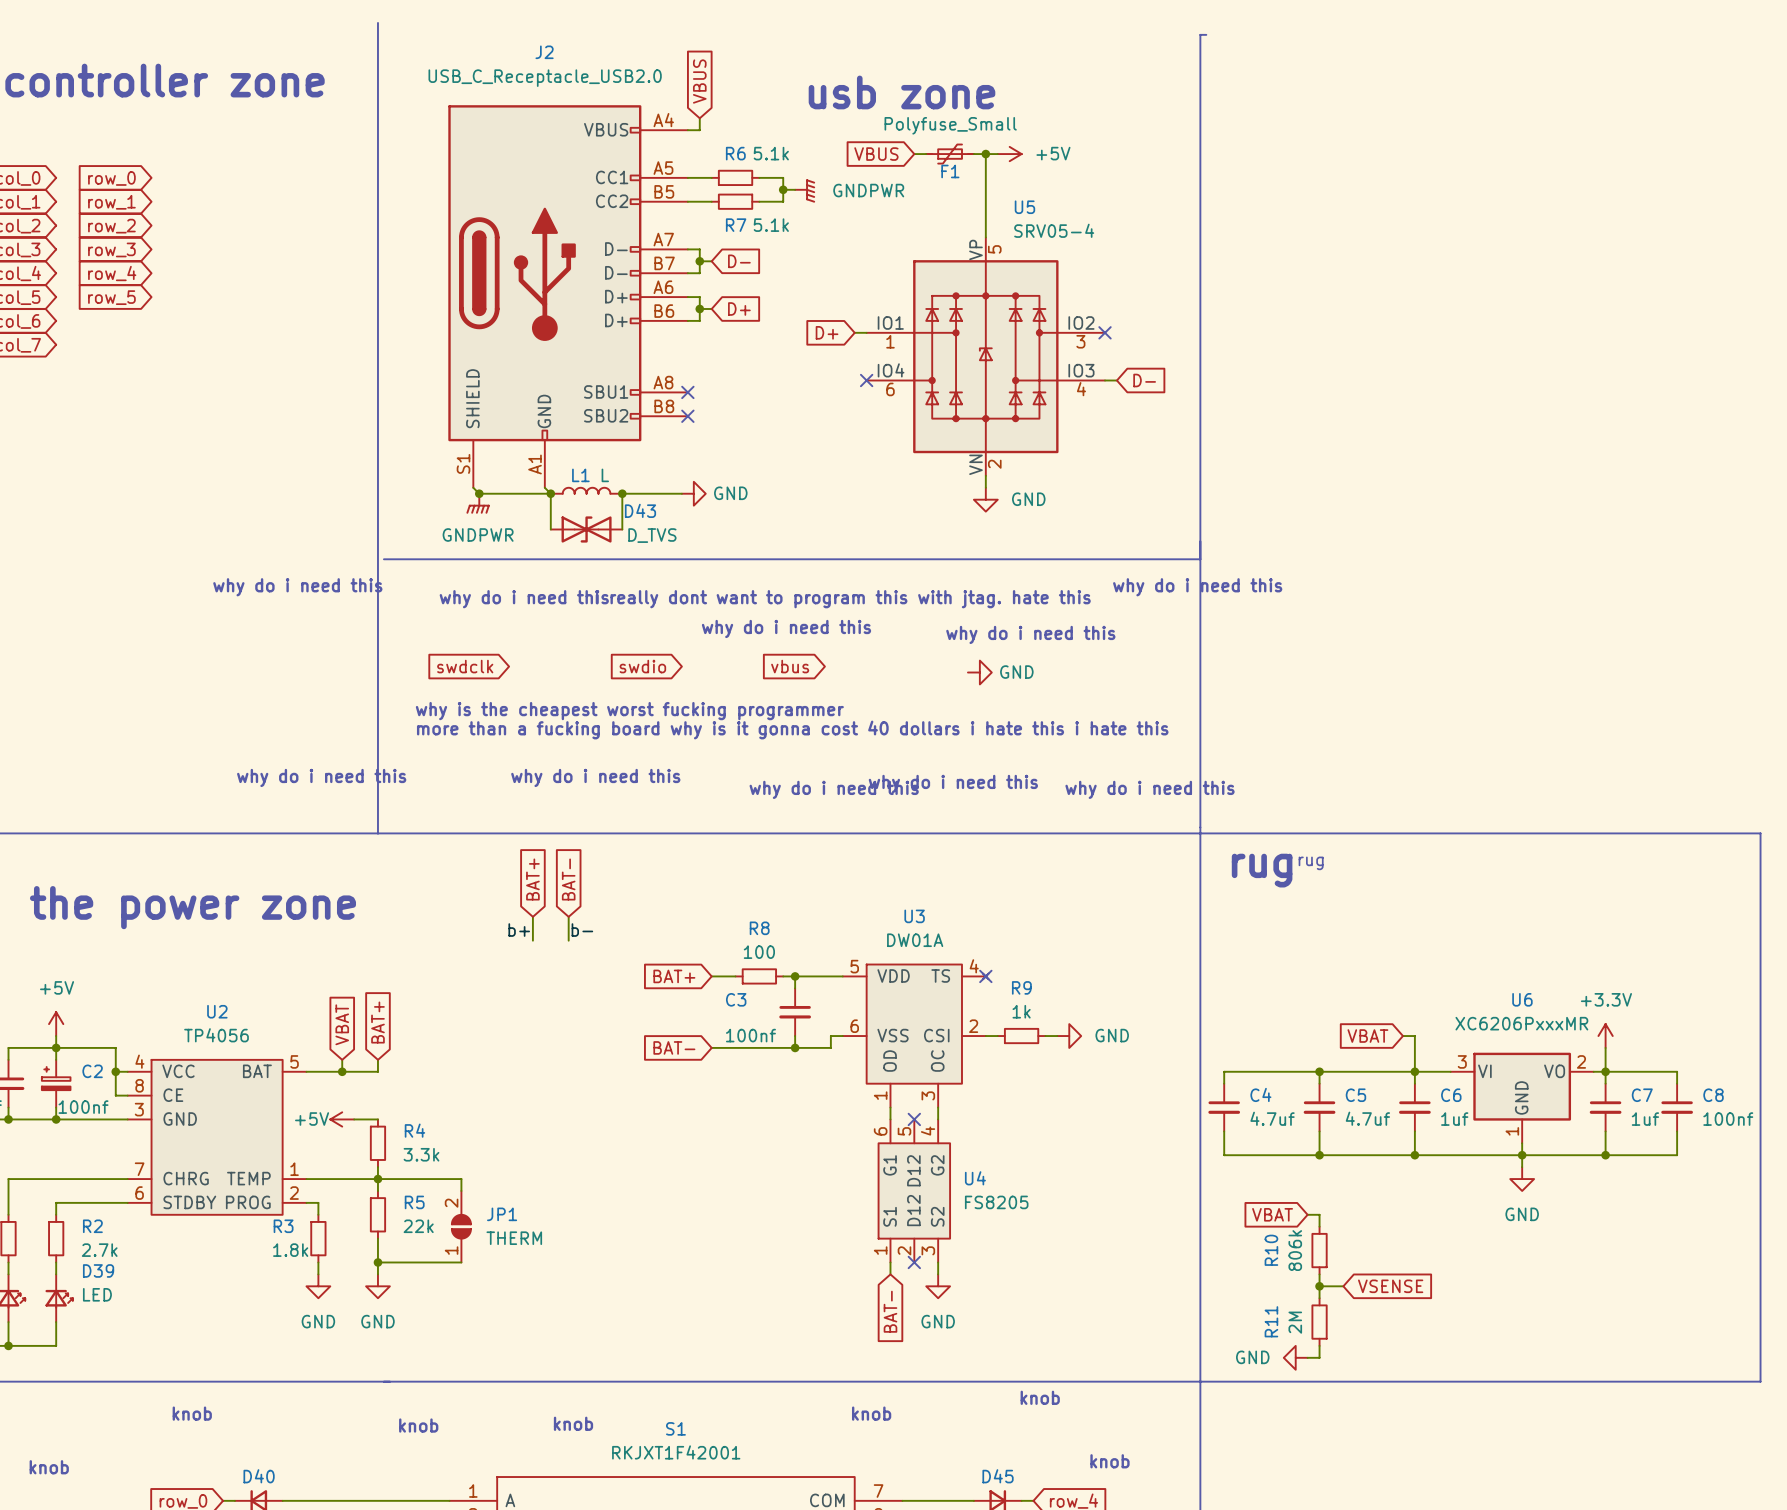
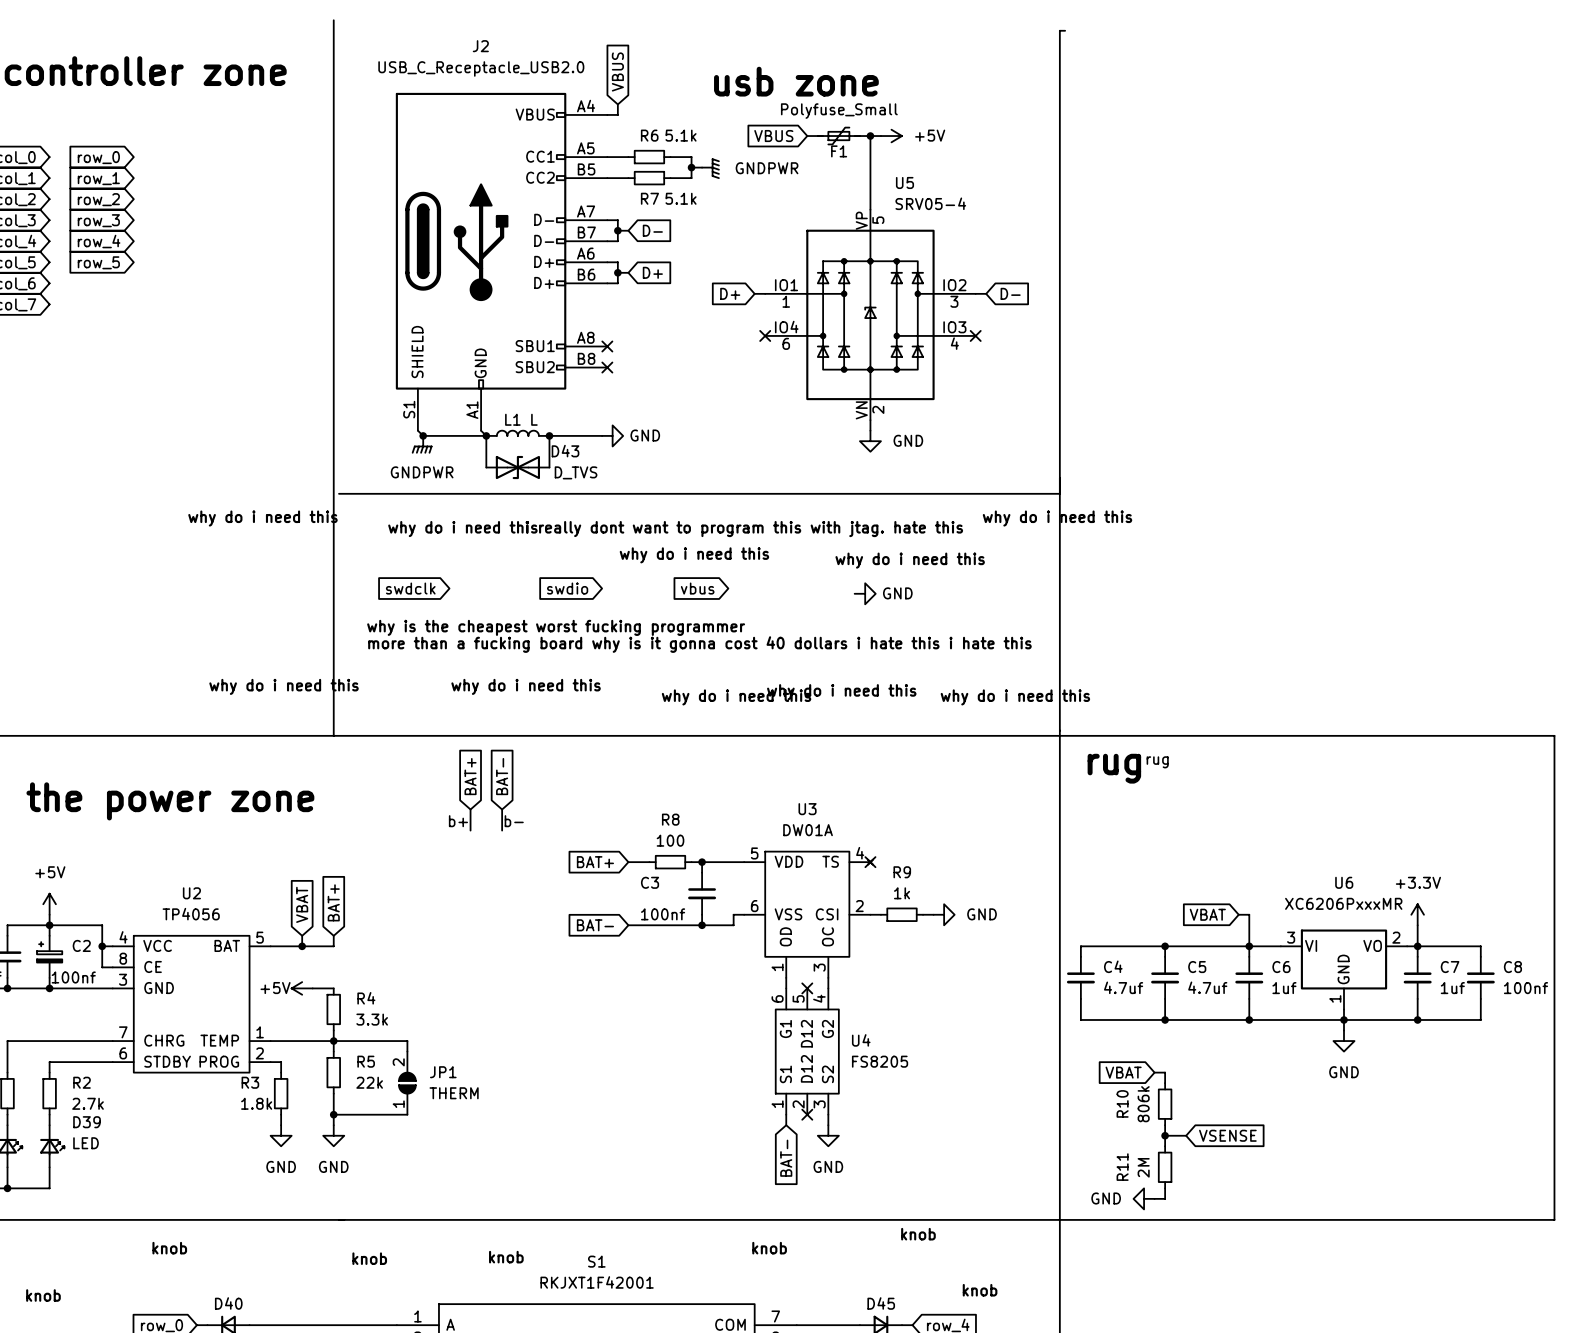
no-connect mark position: (1105, 332) -> (975, 335)
wire: (1105, 380) (1116, 380) -> (975, 293) (986, 293)
global label position: D- (1144, 380) -> D- (1010, 293)

